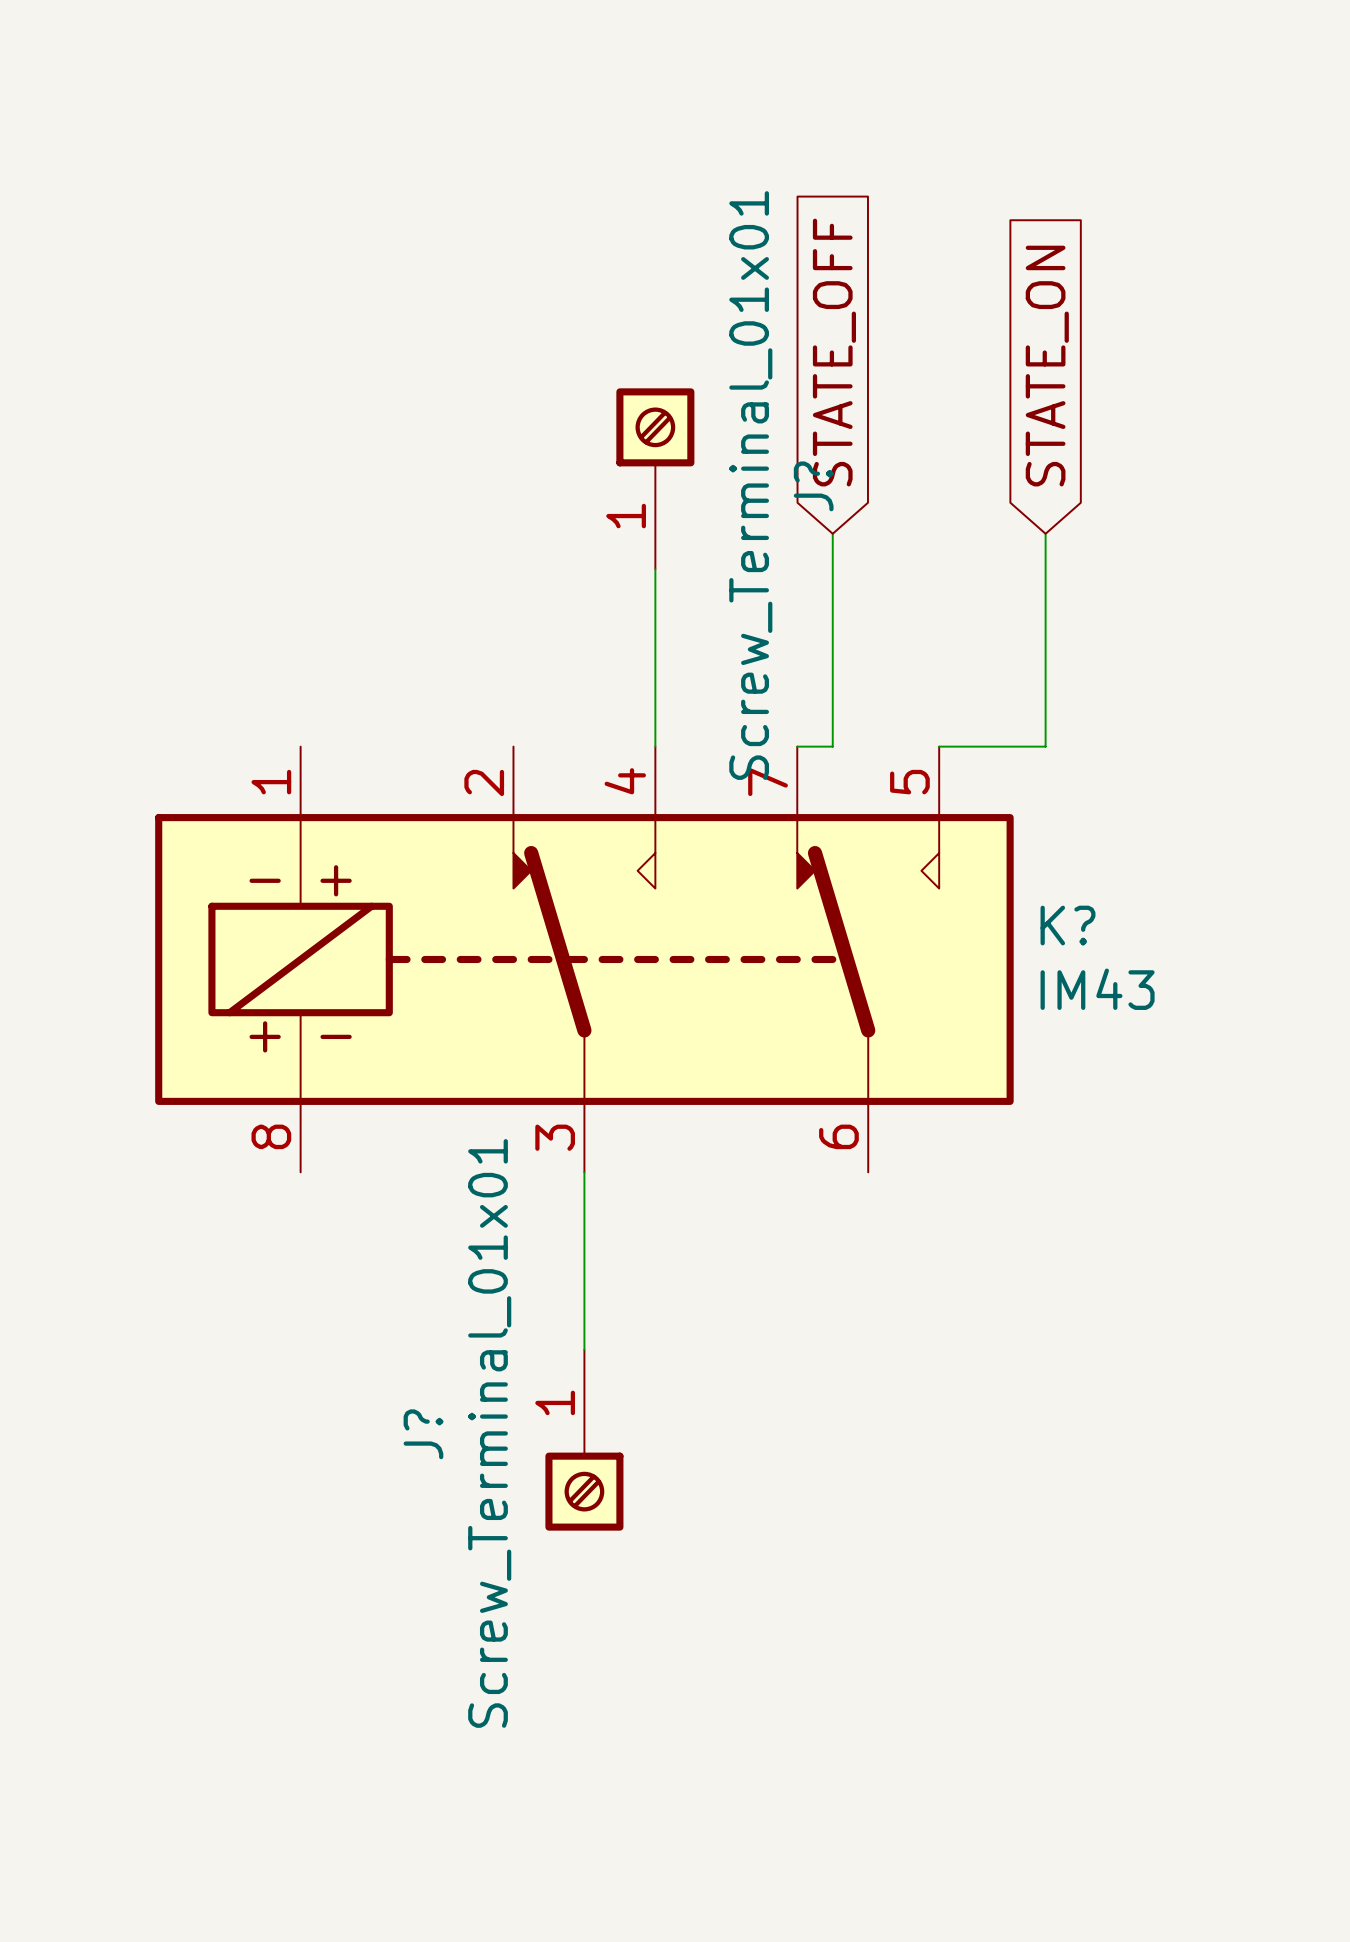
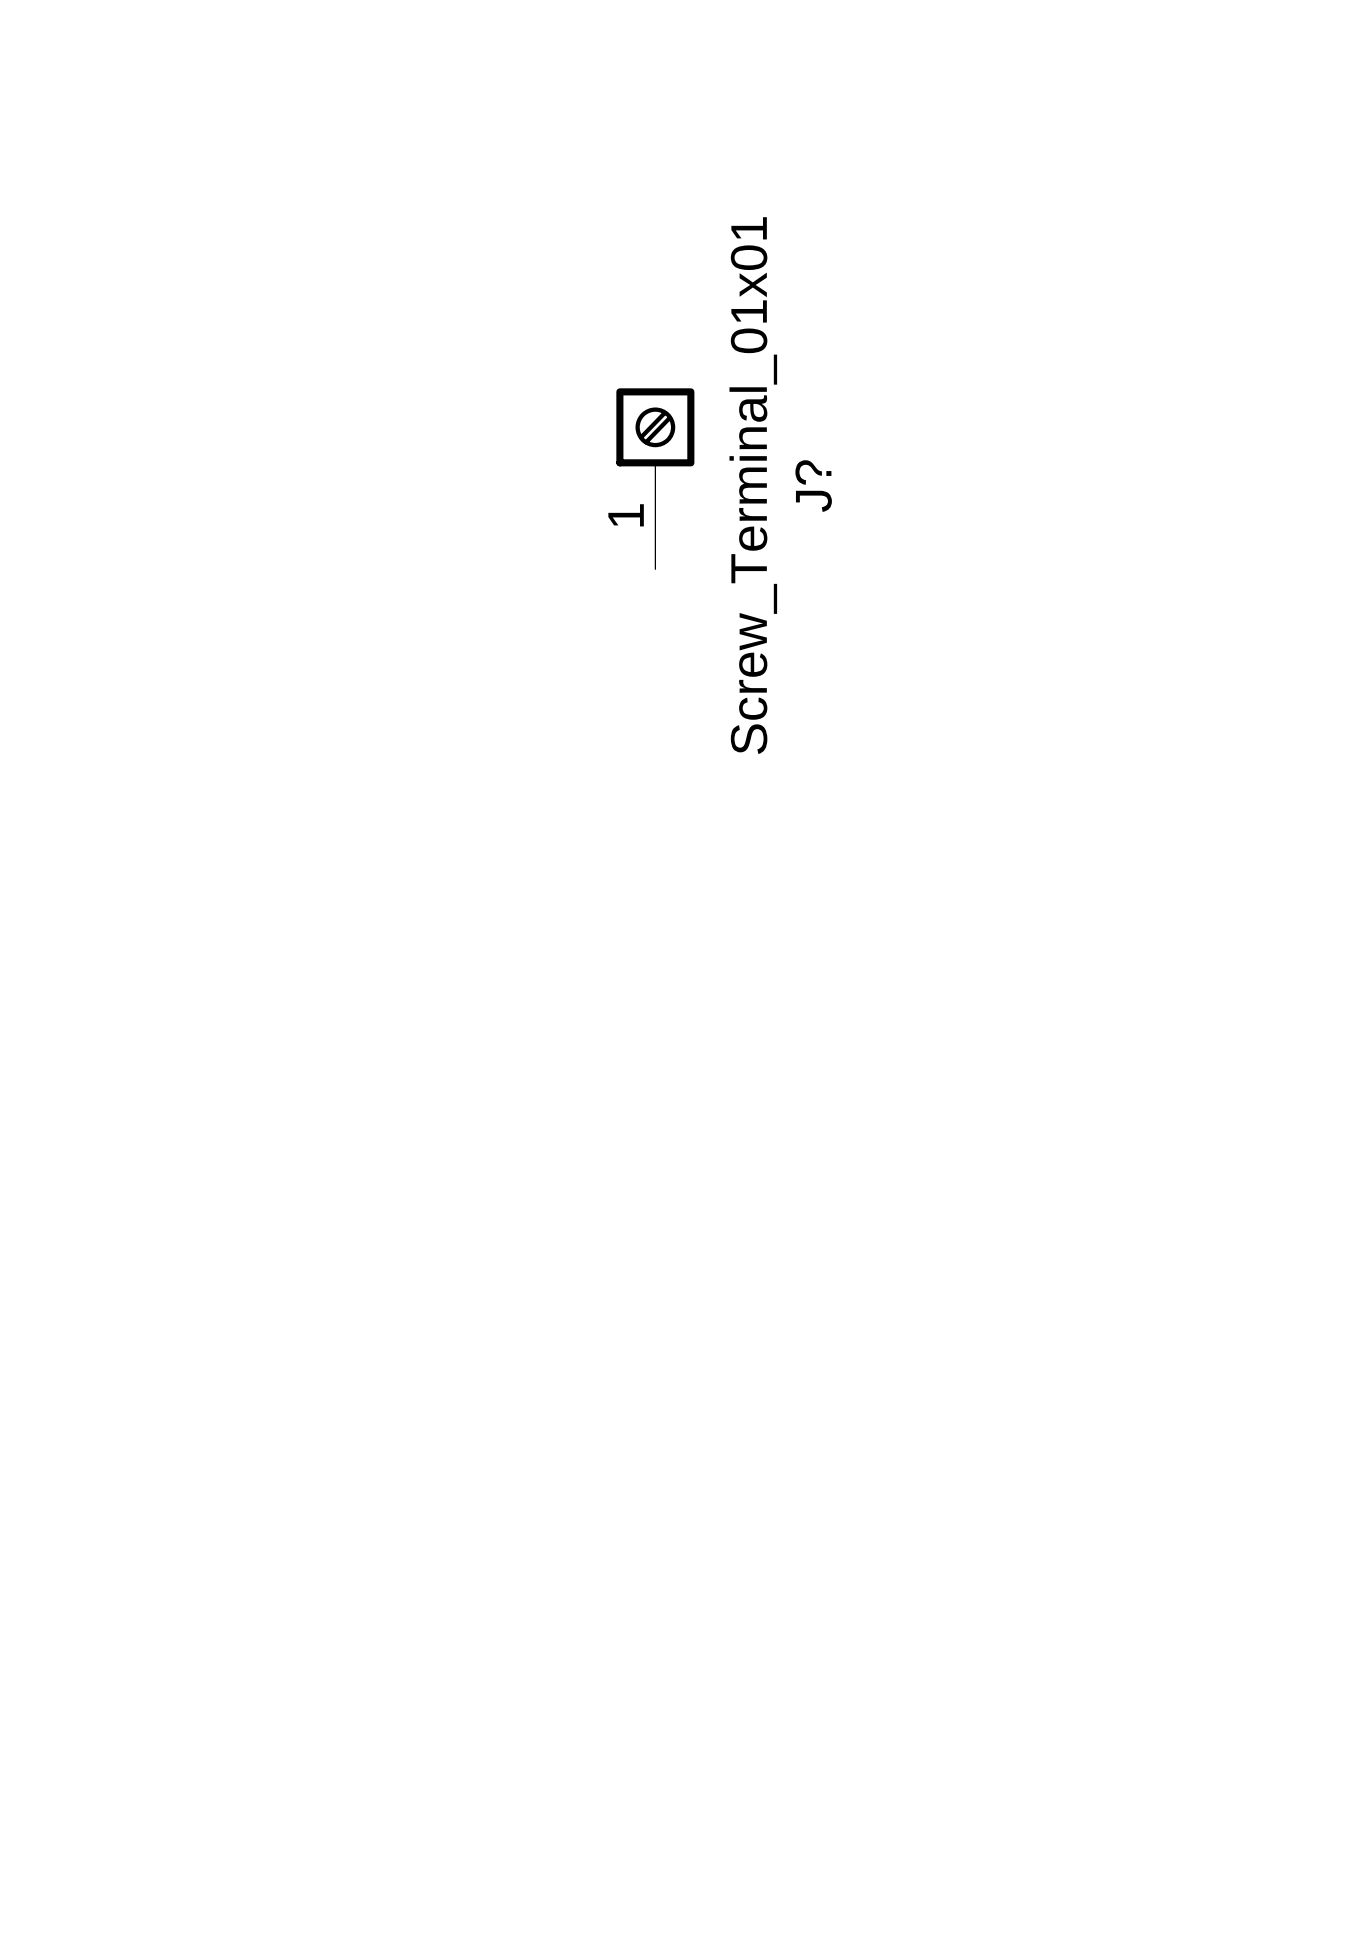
global label: STATE_OFF (834, 352) -> none
global label: STATE_ON (1047, 366) -> none
wire: (832, 533) (832, 746) (797, 746) -> none
wire: (1045, 533) (1045, 746) (939, 746) -> none
wire: (655, 569) (655, 746) -> none
K?: IM43 (584, 959) -> none
wire: (584, 1172) (584, 1349) -> none
J?: Screw_Terminal_01x01 (584, 1440) -> none

